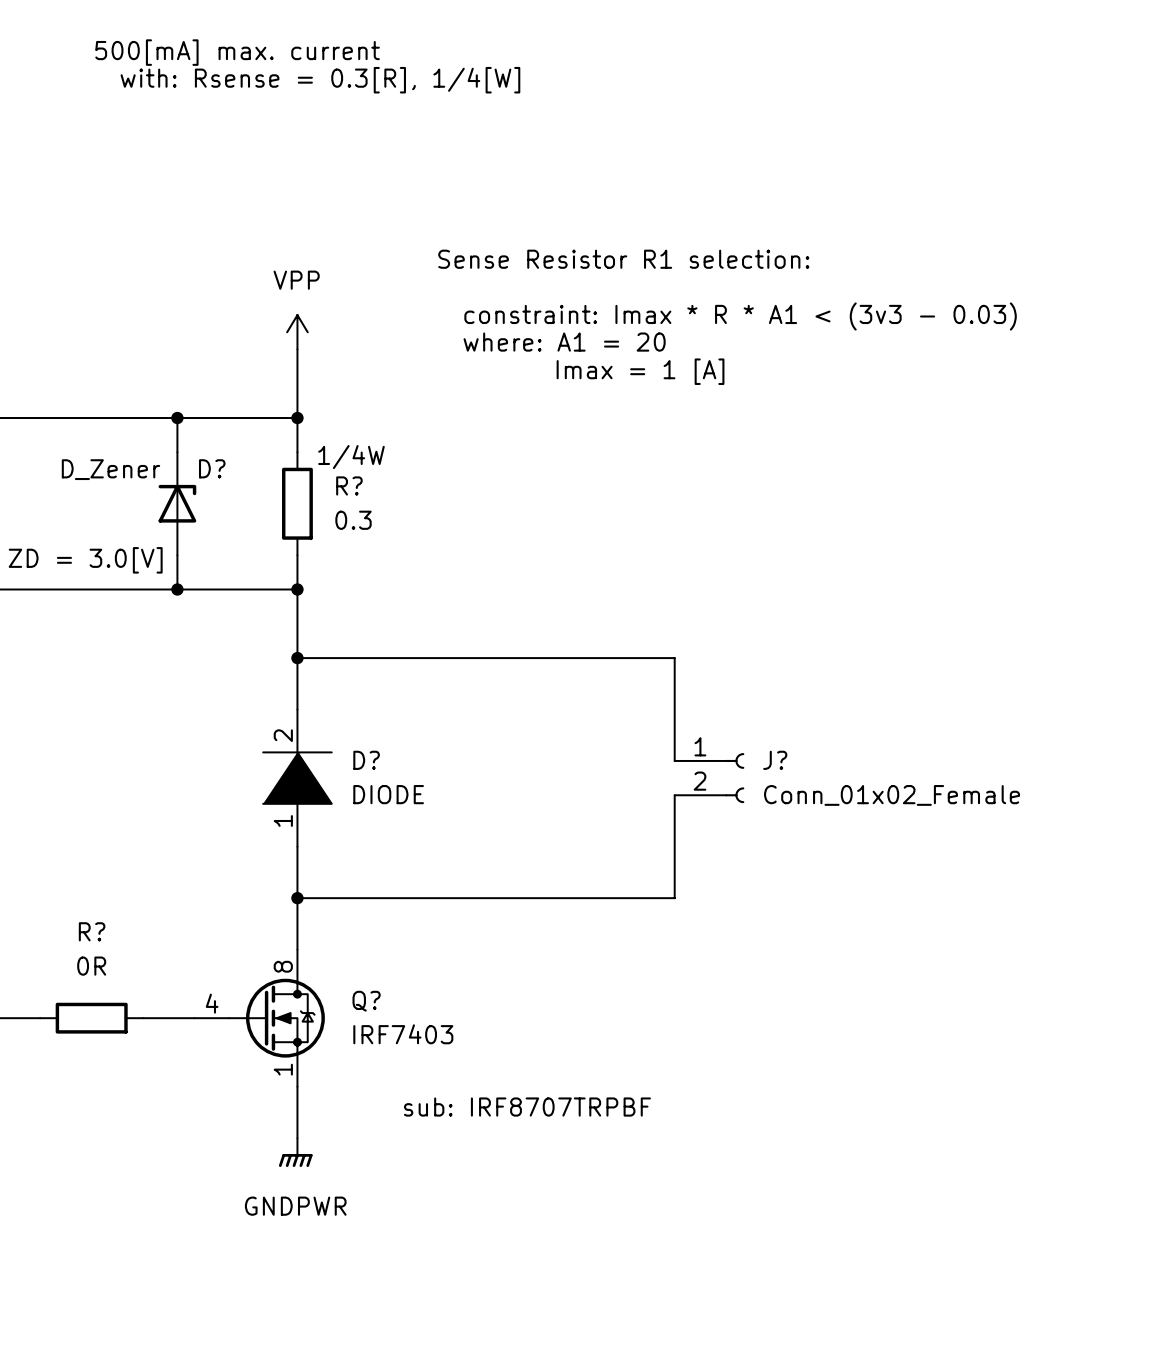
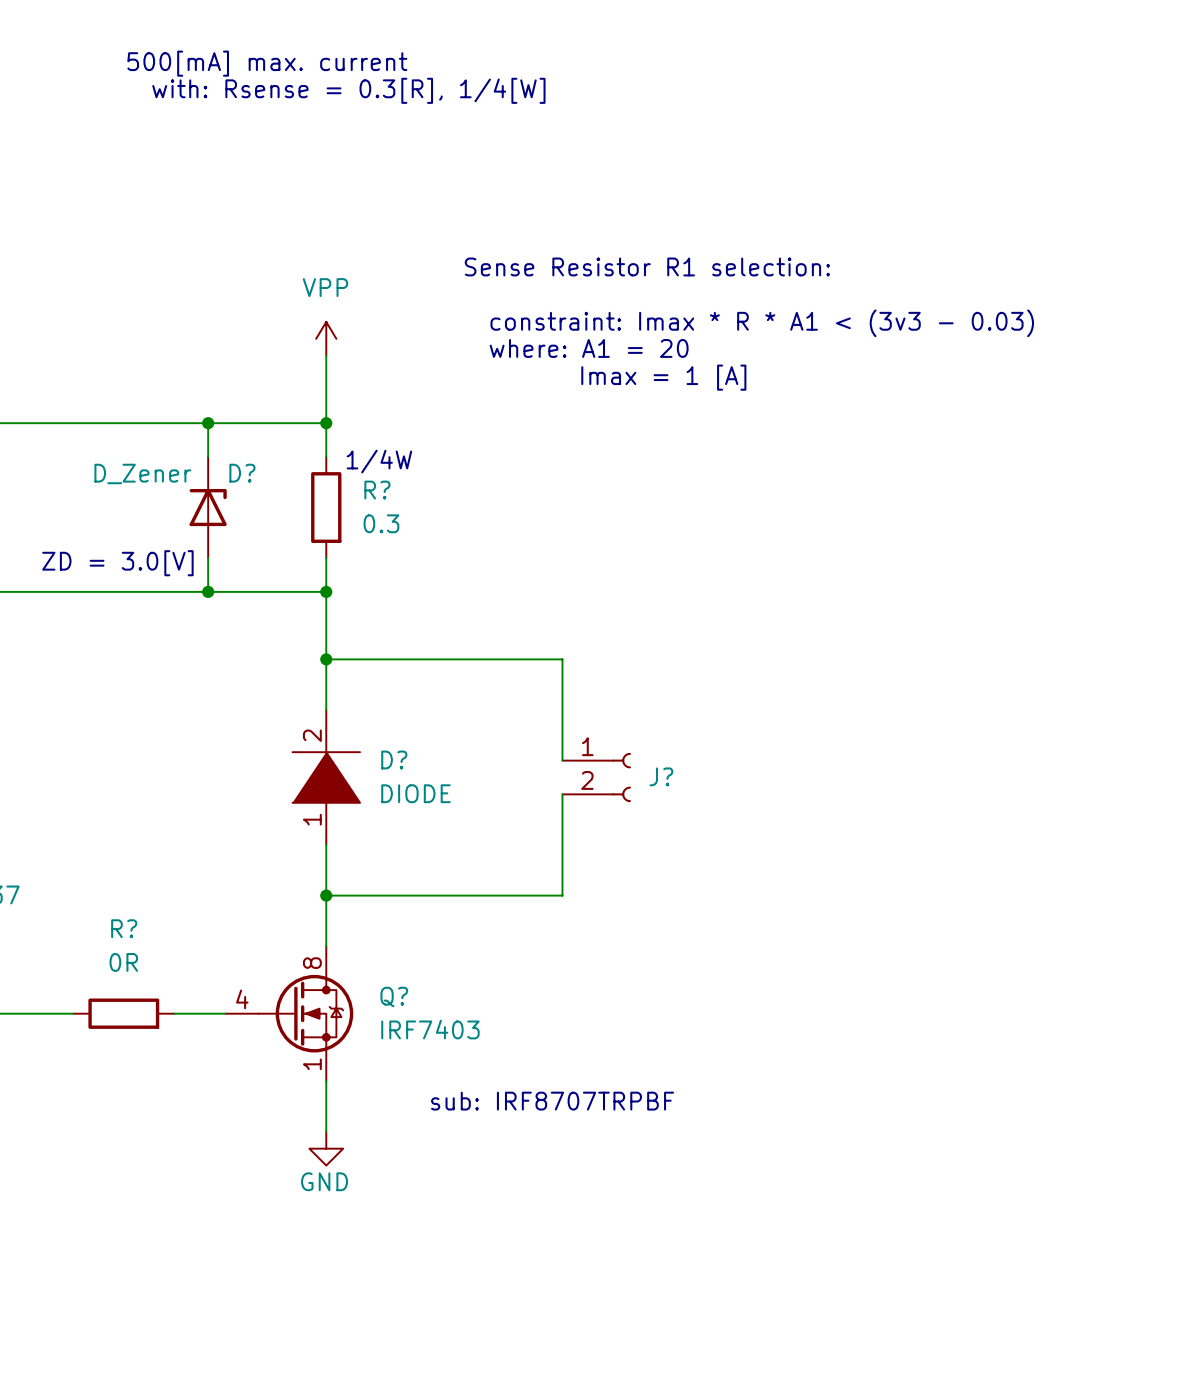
wire: (537, 658) (674, 658) (674, 760) -> (562, 659) (562, 760)
J?: none -> (596, 777)
J?: Conn_01x02_Female (709, 778) -> none
wire: (674, 795) (674, 898) (537, 898) -> (562, 794) (562, 895)
power symbol: GNDPWR (295, 1152) -> GND (326, 1148)

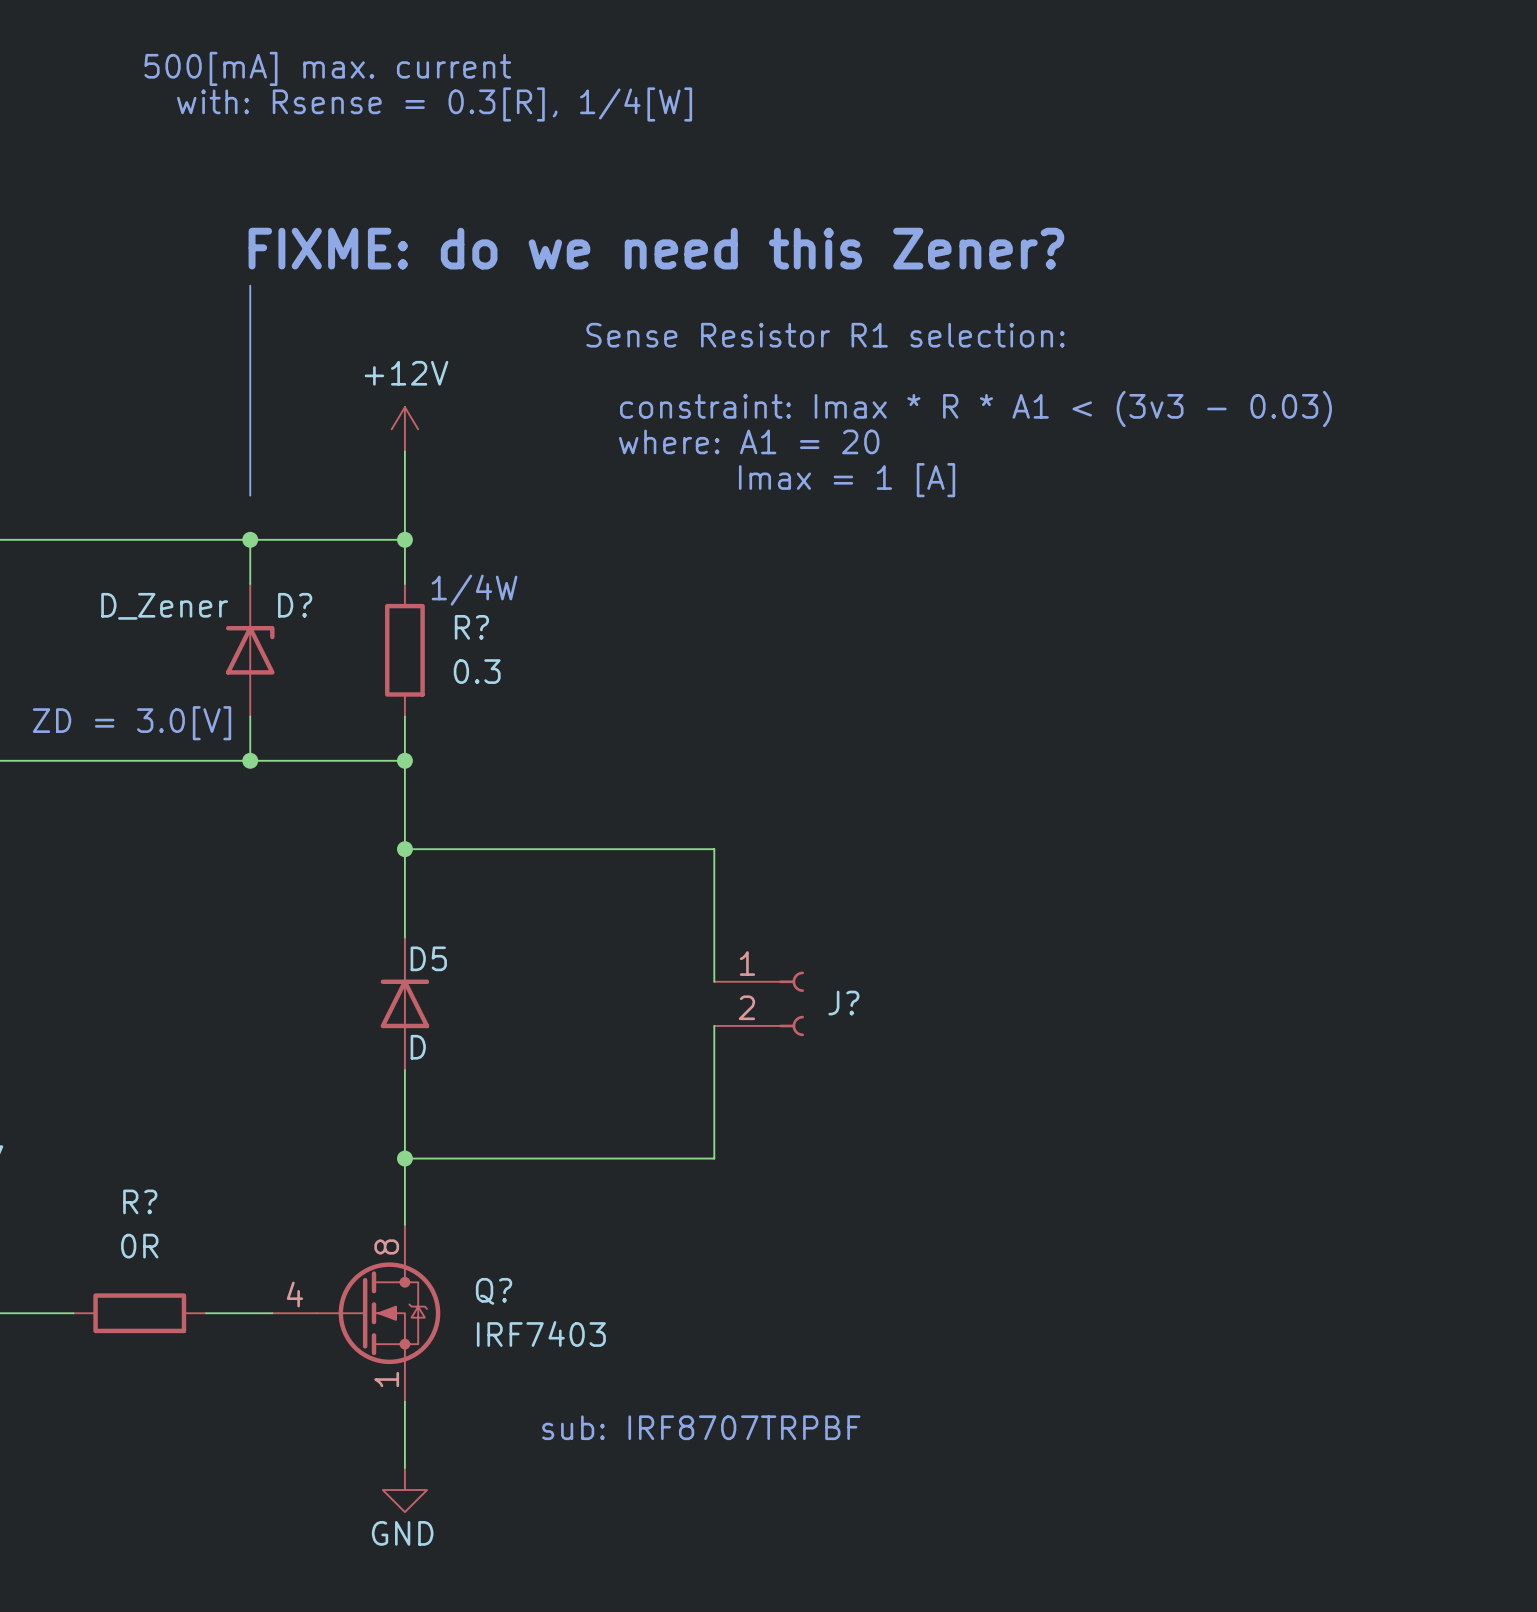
text: none -> FIXME: do we need this Zener? (656, 248)
line: none -> (250, 285) (250, 495)
power symbol: VPP (326, 338) -> +12V (404, 429)
D?: DIODE (326, 777) -> none
D5: none -> D (404, 1003)

